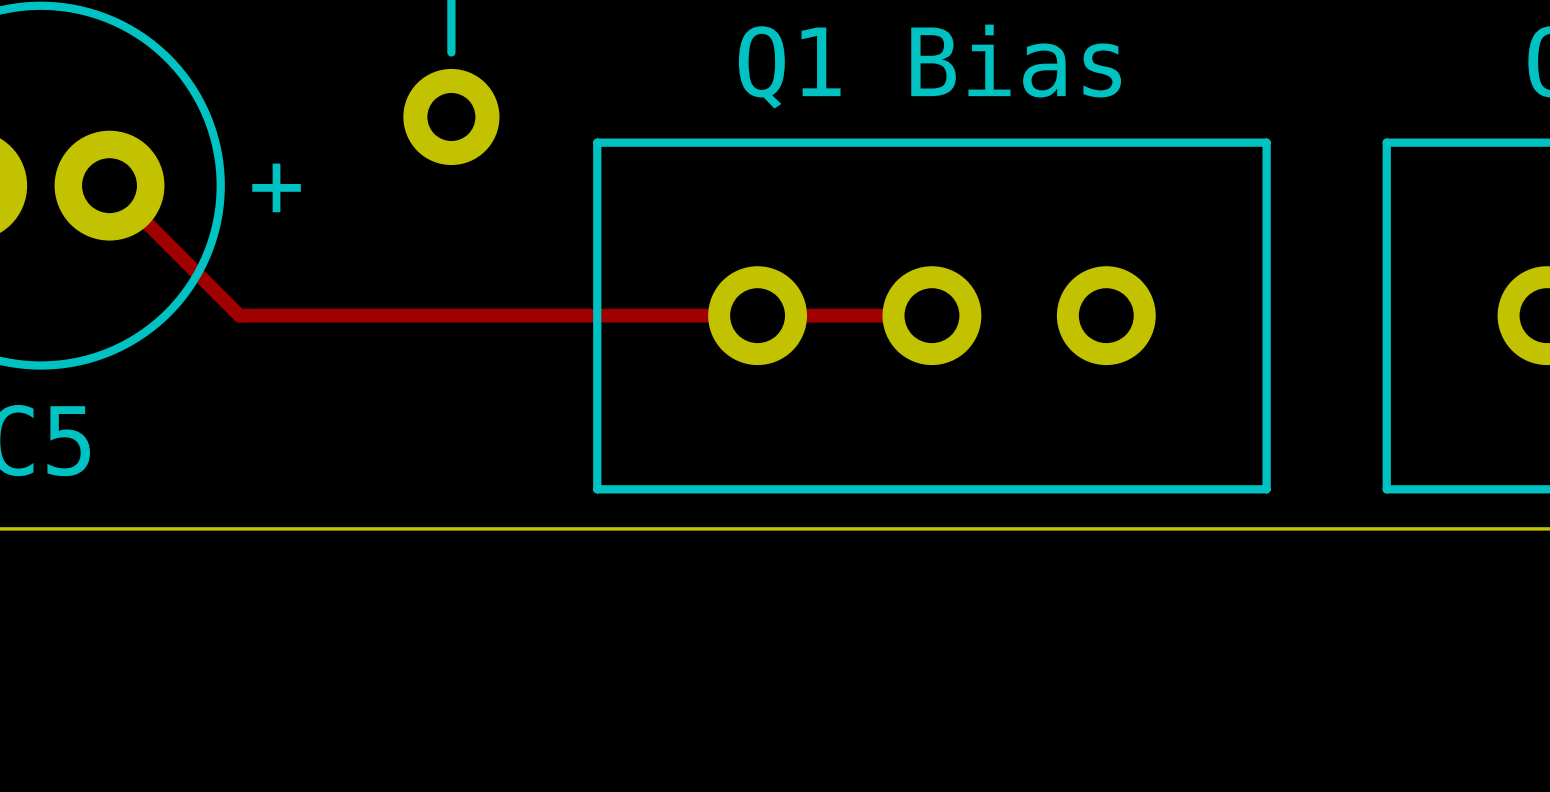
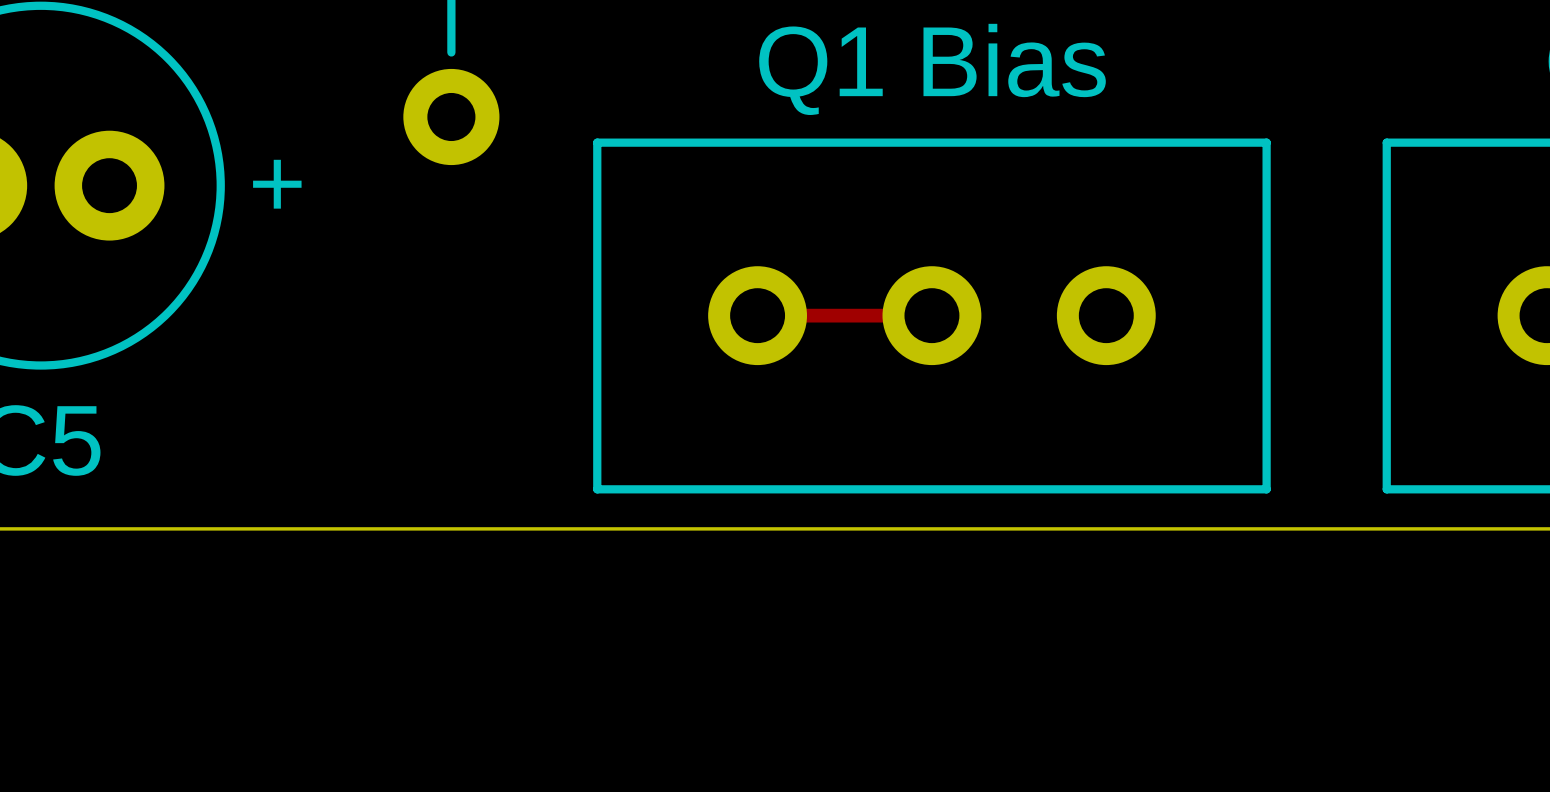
track: (109, 185) (239, 315) (757, 315) -> none

